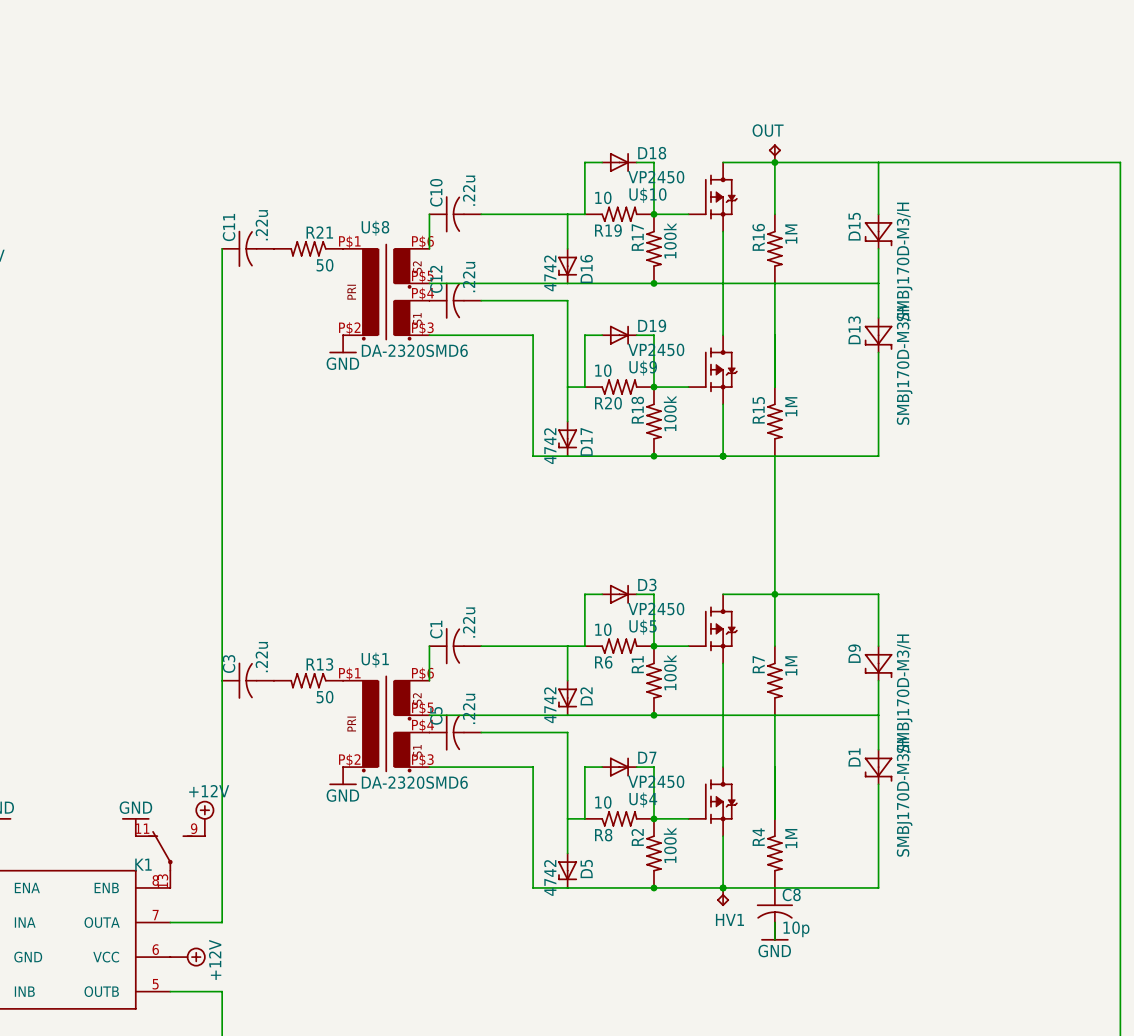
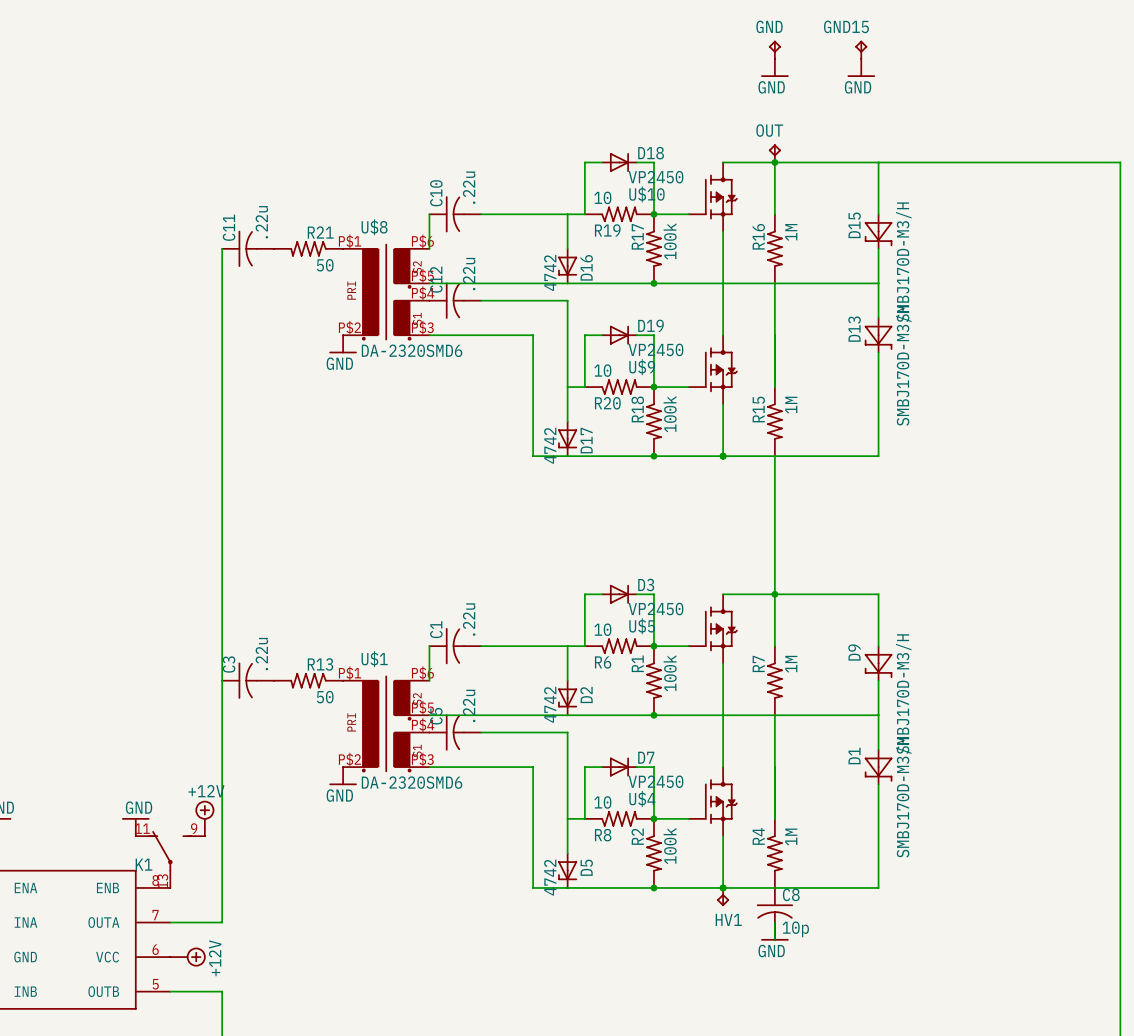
GND: none -> (774, 49)
GND15: none -> (861, 49)
power symbol: none -> GND (774, 67)
power symbol: none -> GND (861, 67)

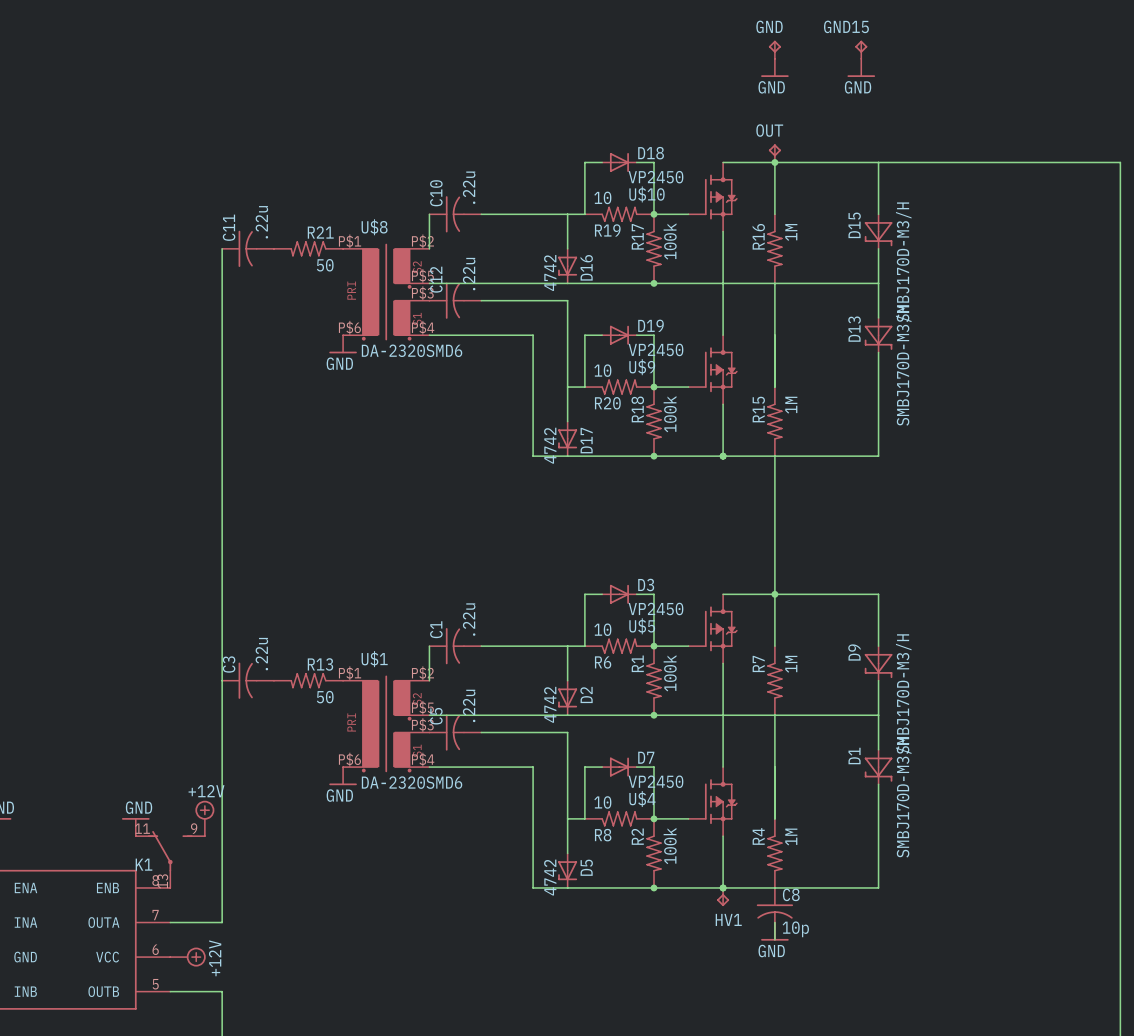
U$8 pin number: P$6 (422, 241) -> P$2 (422, 241)
U$8 pin number: P$4 (423, 293) -> P$3 (422, 293)
U$8 pin number: P$2 (349, 327) -> P$6 (349, 327)
U$8 pin number: P$3 (422, 327) -> P$4 (423, 327)
U$1 pin number: P$6 (422, 673) -> P$2 (422, 673)
U$1 pin number: P$4 (423, 725) -> P$3 (422, 725)
U$1 pin number: P$2 (349, 759) -> P$6 (349, 759)
U$1 pin number: P$3 (422, 759) -> P$4 (423, 759)

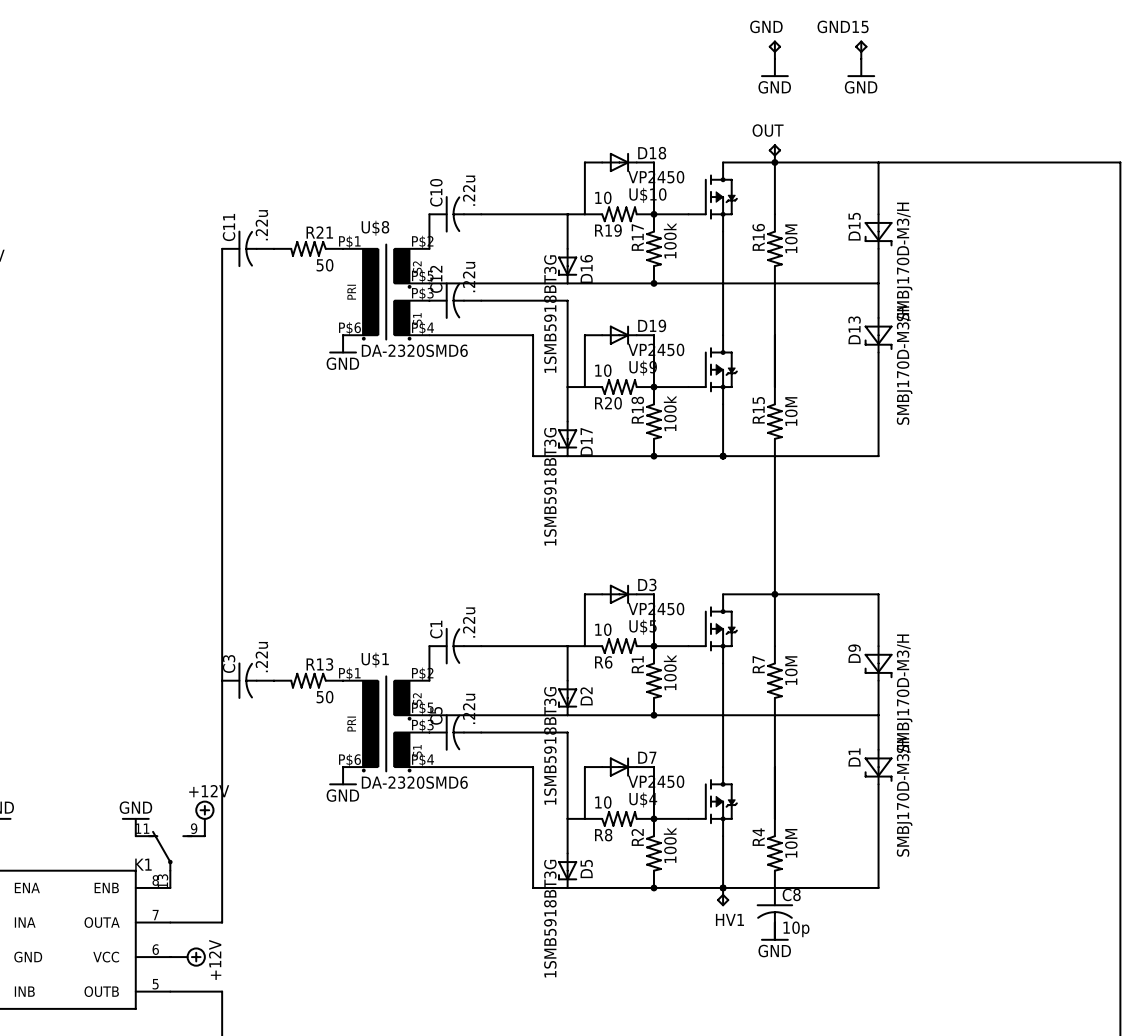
R16 value: 1M (791, 232) -> 10M (791, 238)
D16 value: 4742 (550, 272) -> 1SMB5918BT3G (550, 314)
R15 value: 1M (791, 405) -> 10M (791, 411)
D17 value: 4742 (550, 445) -> 1SMB5918BT3G (550, 486)
R7 value: 1M (791, 664) -> 10M (791, 670)
D2 value: 4742 (550, 704) -> 1SMB5918BT3G (550, 745)
R4 value: 1M (791, 836) -> 10M (791, 843)
D5 value: 4742 (550, 877) -> 1SMB5918BT3G (550, 918)

